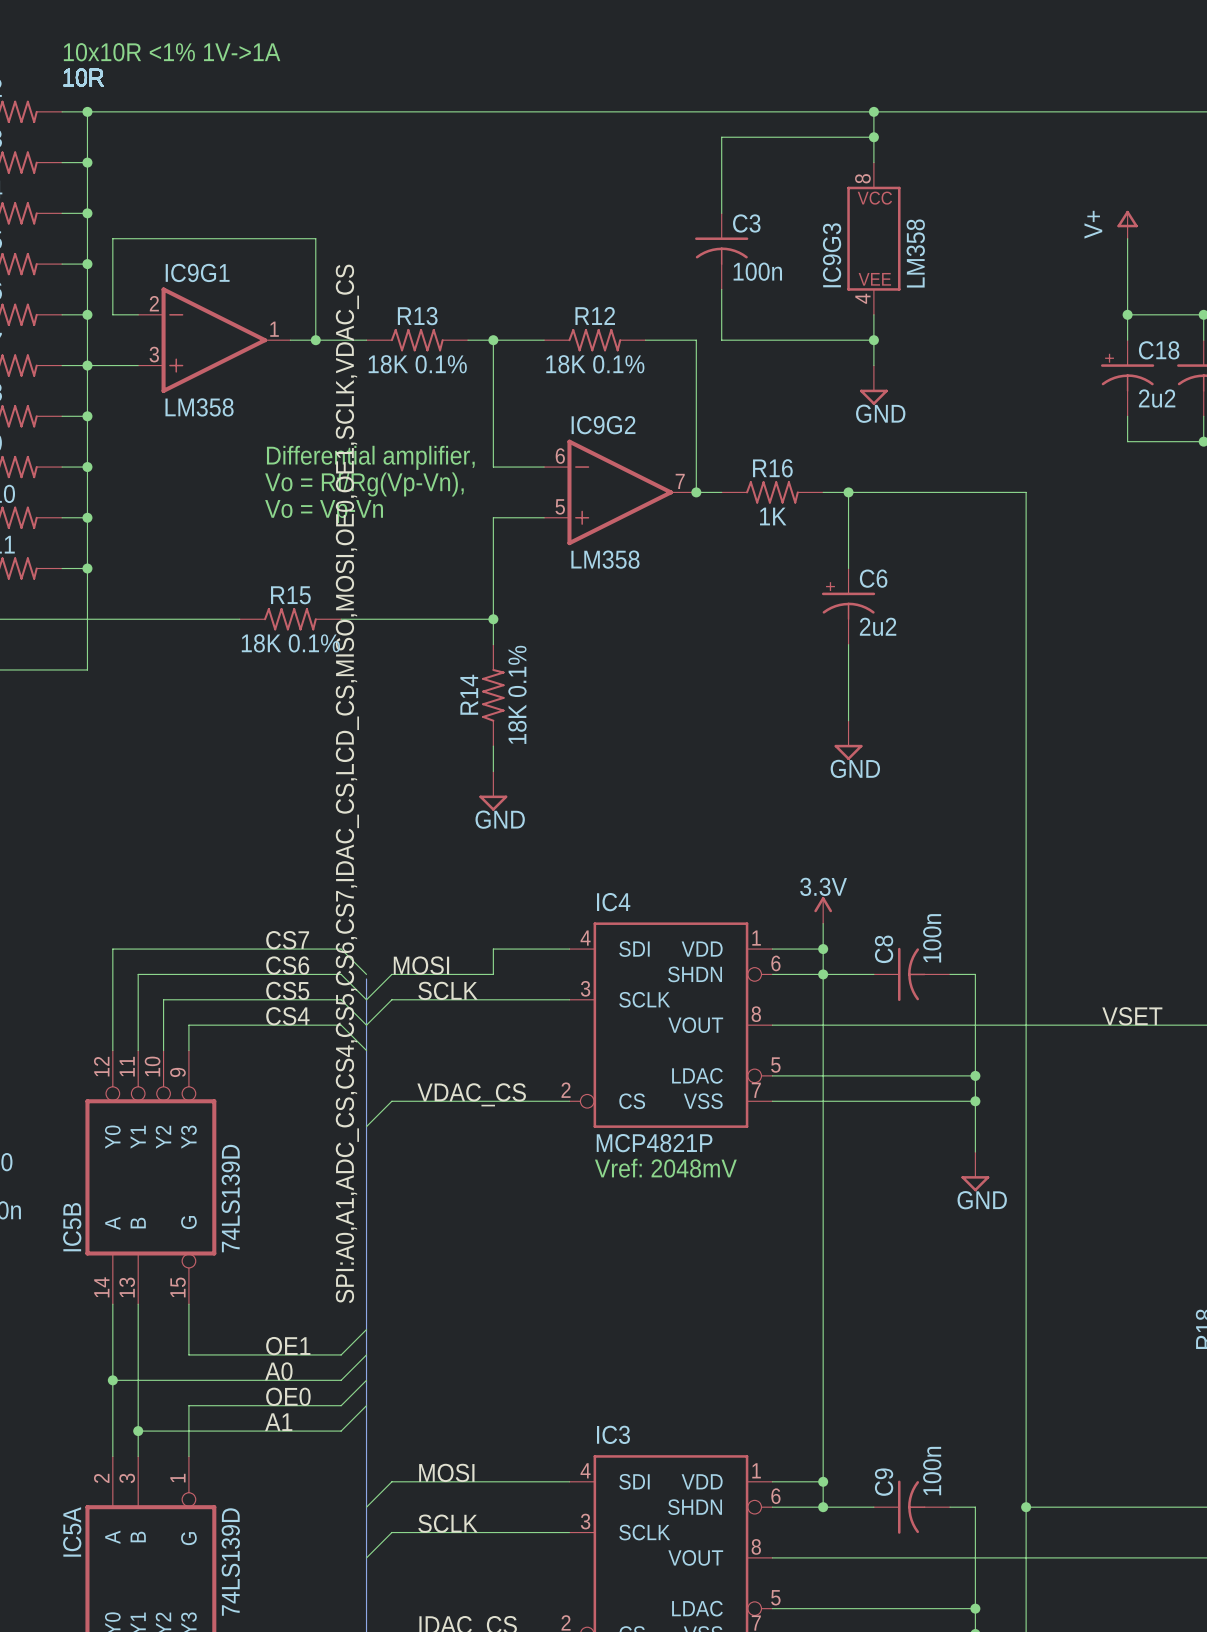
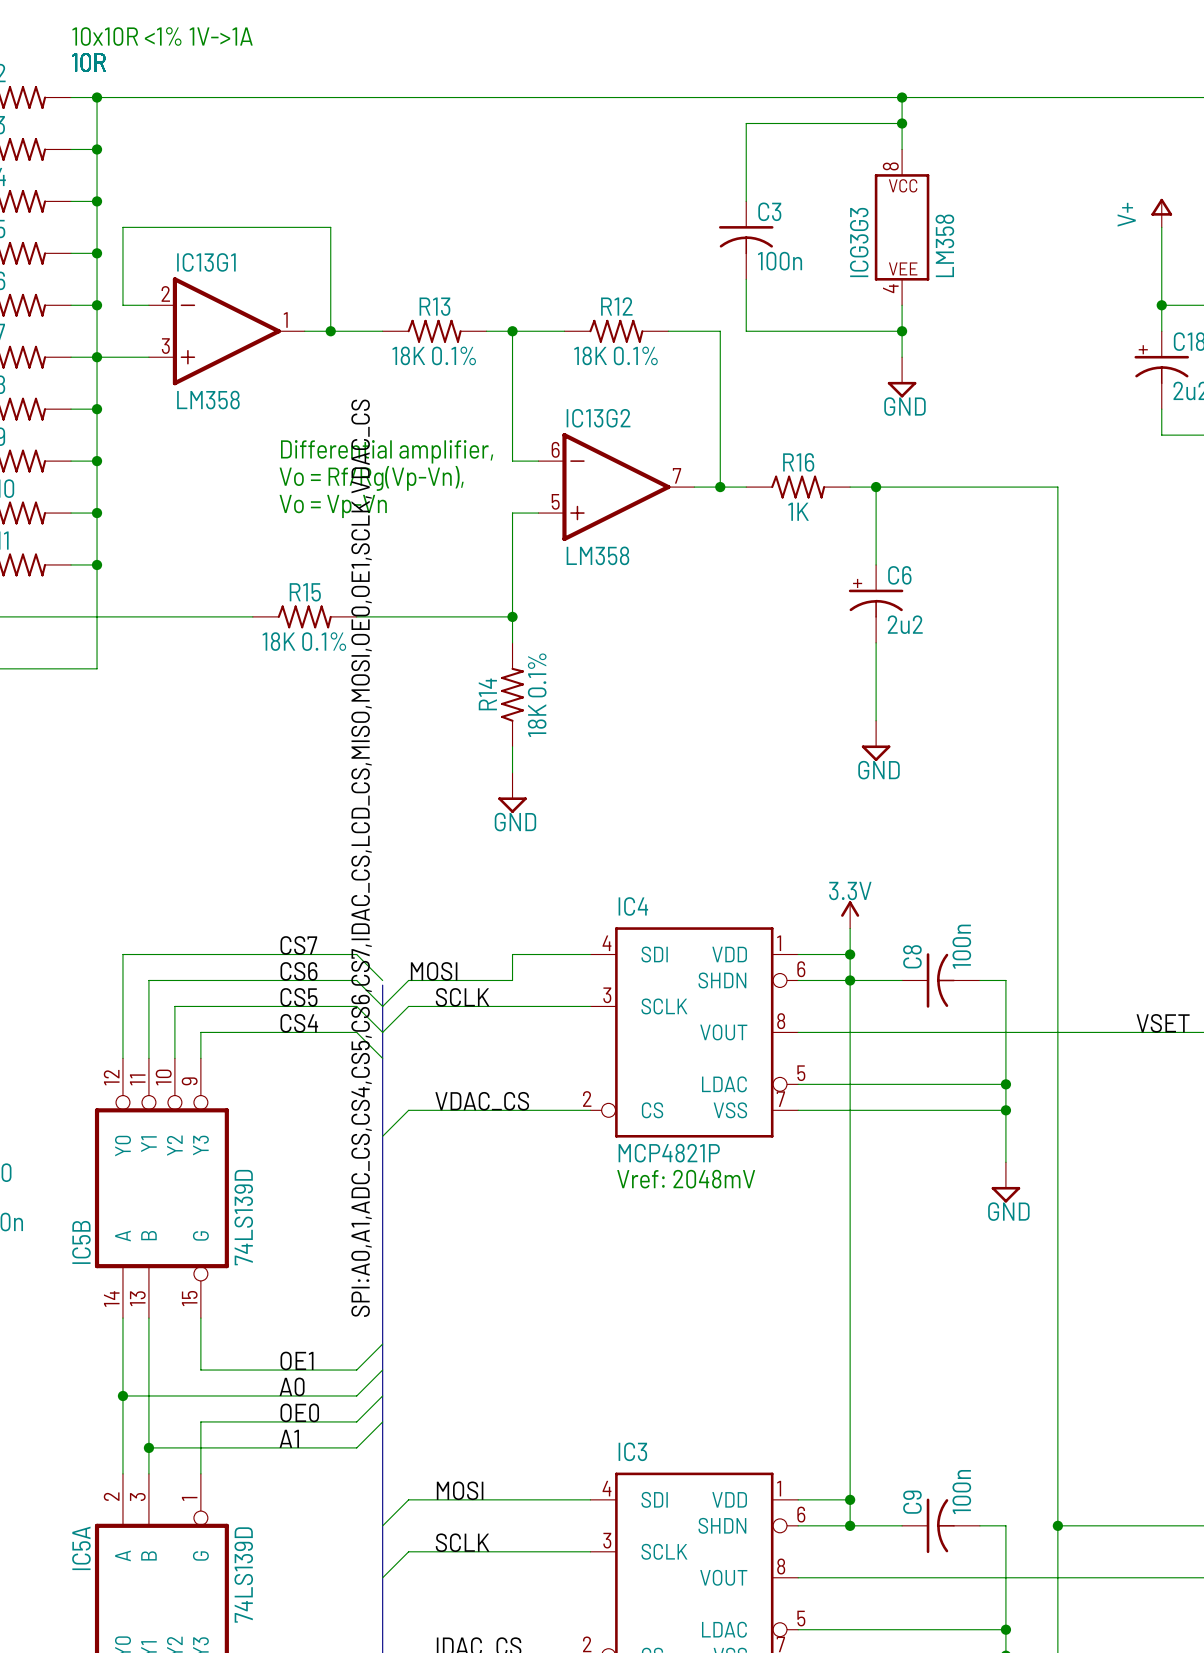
IC9G3 name: IC9G3 (832, 255) -> ICG3G3 (859, 242)
IC9G1 name: IC9G1 (197, 272) -> IC13G1 (206, 262)
IC13G2: none -> LM358 (616, 487)
IC9G2: LM358 (620, 492) -> none

